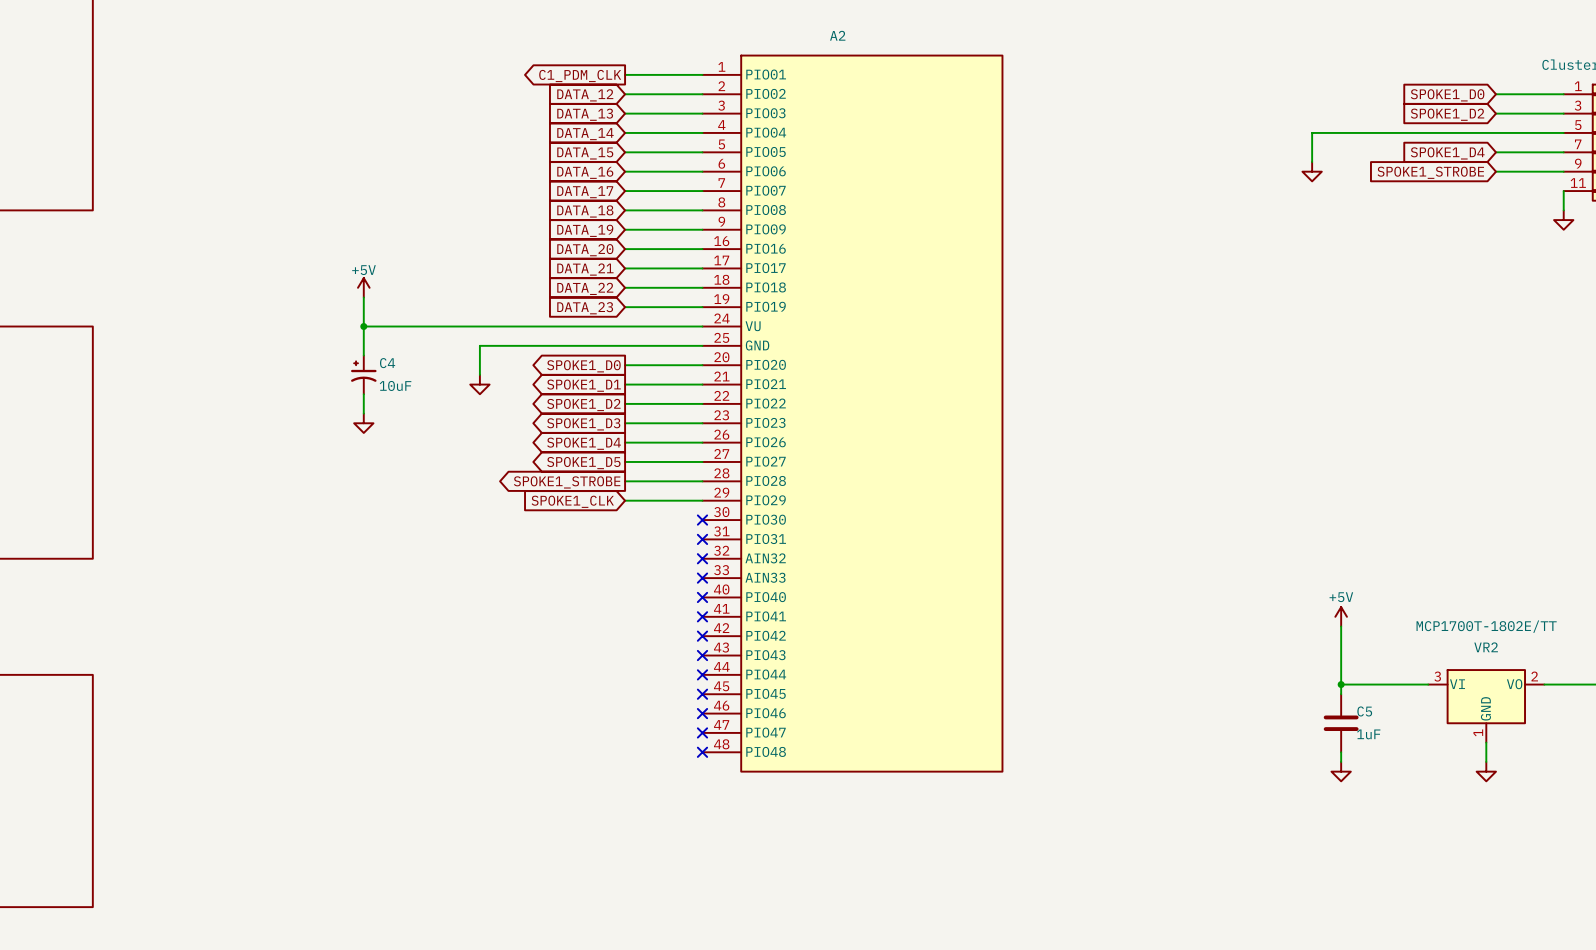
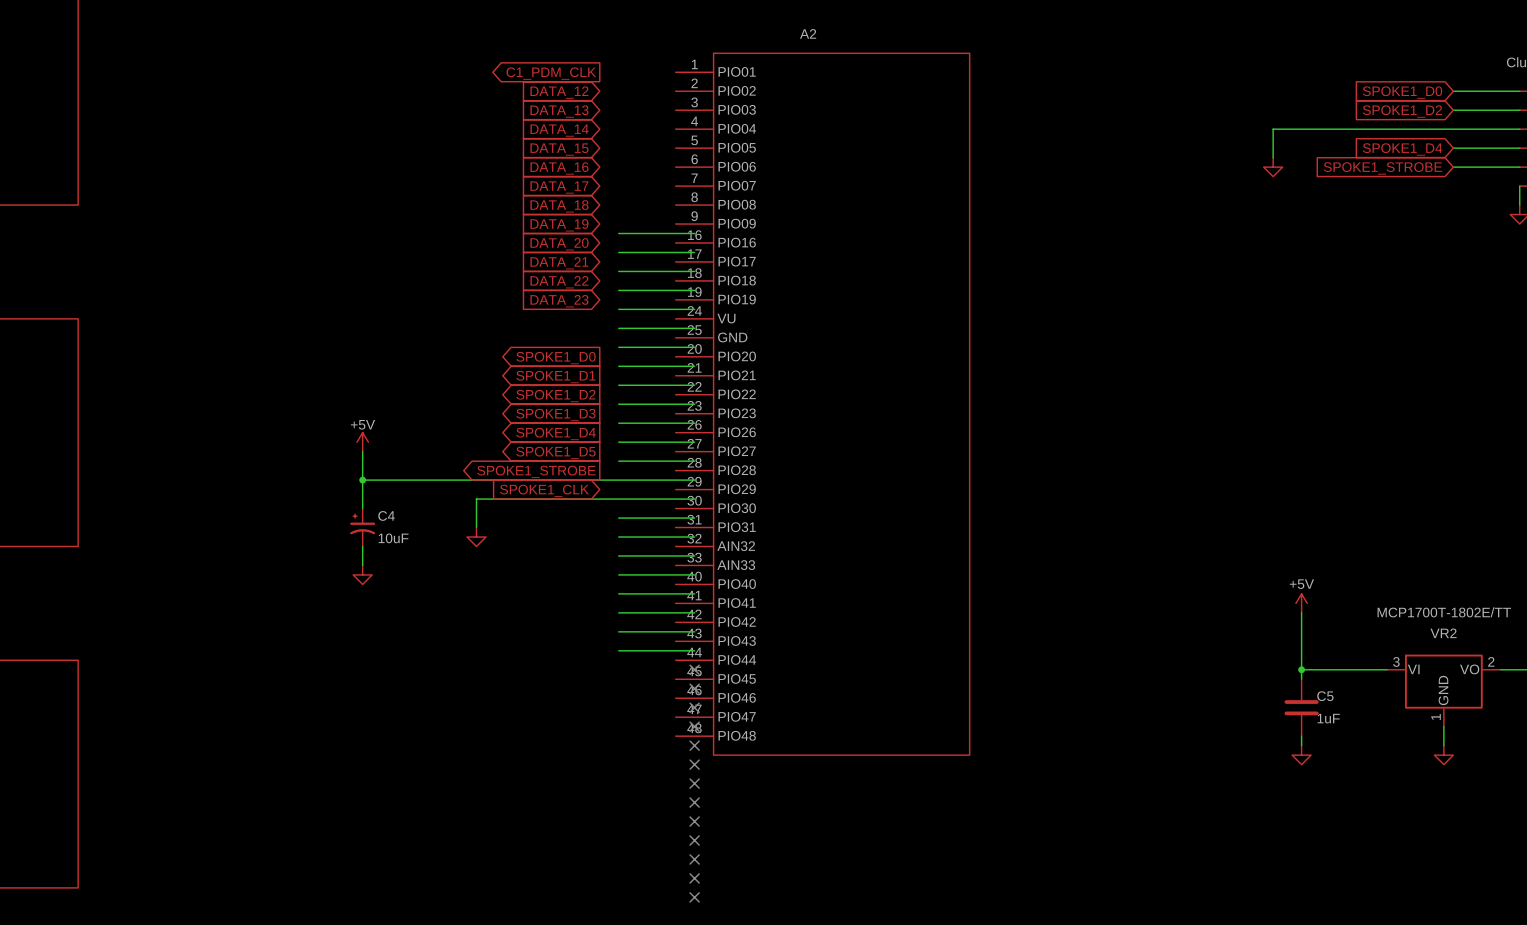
wire: (625, 74) (702, 74) -> (618, 233) (694, 233)
wire: (625, 94) (702, 94) -> (618, 252) (694, 252)
wire: (625, 113) (702, 113) -> (618, 271) (694, 271)
wire: (625, 132) (702, 132) -> (618, 290) (694, 290)
wire: (625, 152) (702, 152) -> (618, 309) (694, 309)
wire: (625, 171) (702, 171) -> (618, 328) (694, 328)
wire: (625, 191) (702, 191) -> (618, 347) (694, 347)
wire: (625, 210) (702, 210) -> (618, 366) (694, 366)
wire: (625, 229) (702, 229) -> (618, 385) (694, 385)
wire: (625, 249) (702, 249) -> (618, 404) (694, 404)
wire: (625, 268) (702, 268) -> (618, 423) (694, 423)
power symbol position: +5V (363, 287) -> +5V (362, 442)
wire: (625, 287) (702, 287) -> (618, 442) (694, 442)
wire: (363, 297) (363, 355) -> (362, 451) (362, 508)
wire: (625, 307) (702, 307) -> (618, 461) (694, 461)
wire: (363, 326) (702, 326) -> (362, 480) (694, 480)
junction: (363, 326) -> none
wire: (702, 345) (479, 345) (479, 374) -> (694, 499) (476, 499) (476, 527)
wire: (625, 365) (702, 365) -> (618, 518) (694, 518)
C4 position: (363, 374) -> (362, 527)
power symbol: (479, 384) -> none
wire: (625, 384) (702, 384) -> (618, 537) (694, 537)
wire: (363, 394) (363, 413) -> (362, 546) (362, 565)
wire: (625, 403) (702, 403) -> (618, 555) (694, 555)
power symbol: (363, 423) -> none
wire: (625, 423) (702, 423) -> (618, 574) (694, 574)
wire: (625, 442) (702, 442) -> (618, 593) (694, 593)
wire: (625, 461) (702, 461) -> (618, 612) (694, 612)
wire: (625, 481) (702, 481) -> (618, 631) (694, 631)
junction: none -> (362, 480)
wire: (625, 500) (702, 500) -> (618, 650) (694, 650)
no-connect mark: (702, 520) -> none
no-connect mark: (702, 539) -> none
power symbol: none -> (476, 537)
no-connect mark: (702, 558) -> none
no-connect mark: (702, 578) -> none
power symbol: none -> (362, 574)
no-connect mark: (702, 597) -> none
no-connect mark: (702, 616) -> none
no-connect mark: (702, 636) -> none
no-connect mark: (702, 655) -> none
no-connect mark: (702, 674) -> none
no-connect mark: none -> (694, 669)
no-connect mark: (702, 694) -> none
no-connect mark: none -> (694, 688)
no-connect mark: (702, 713) -> none
no-connect mark: none -> (694, 707)
no-connect mark: (702, 732) -> none
no-connect mark: none -> (694, 726)
no-connect mark: (702, 752) -> none
no-connect mark: none -> (694, 745)
no-connect mark: none -> (694, 764)
no-connect mark: none -> (694, 783)
no-connect mark: none -> (694, 802)
no-connect mark: none -> (694, 821)
no-connect mark: none -> (694, 840)
no-connect mark: none -> (694, 859)
no-connect mark: none -> (694, 878)
no-connect mark: none -> (694, 897)

